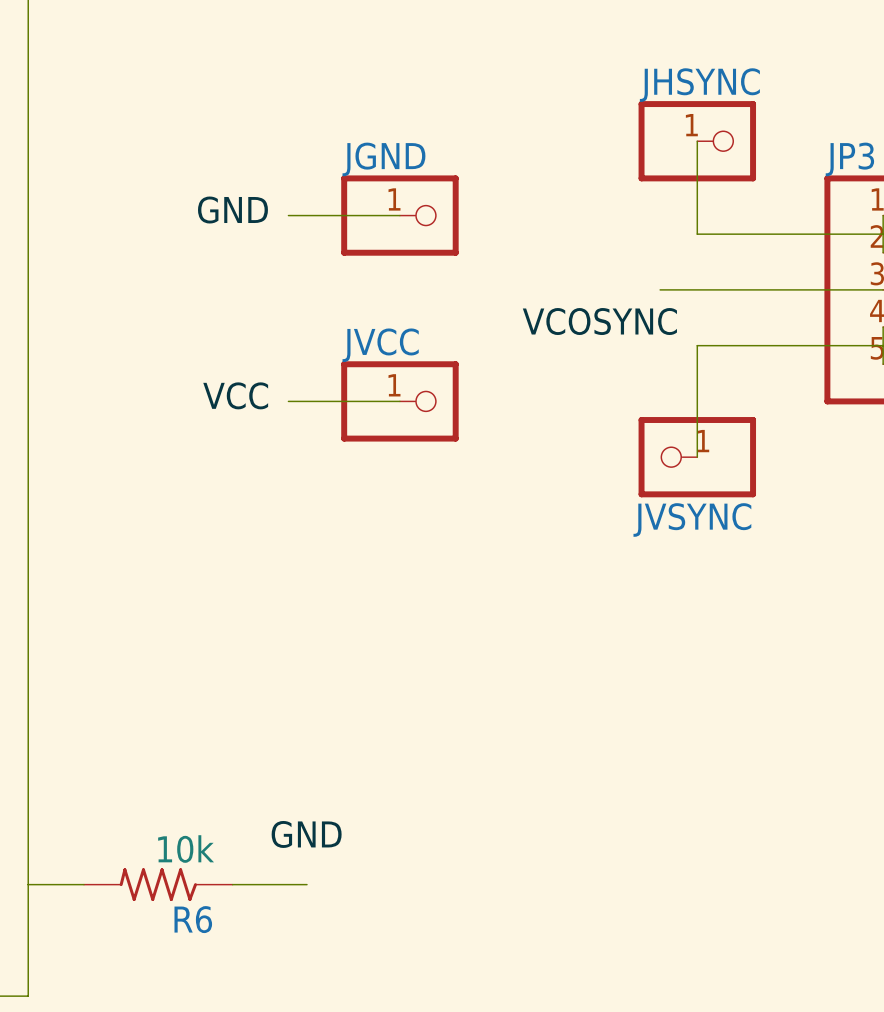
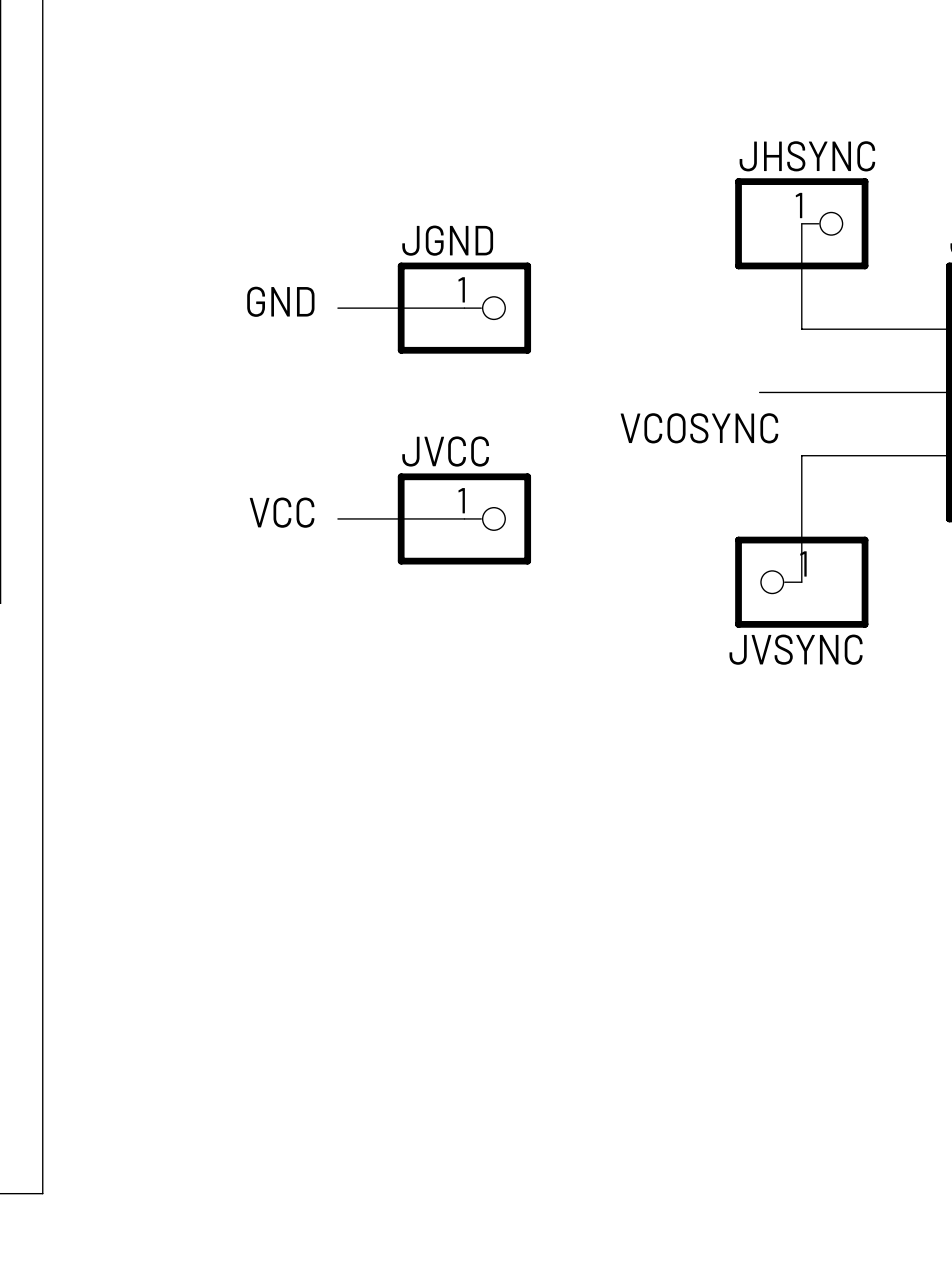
label: GND (306, 834) -> none
wire: (28, 884) (83, 884) -> none
R6: 10k (158, 884) -> none
wire: (232, 884) (307, 884) -> none

